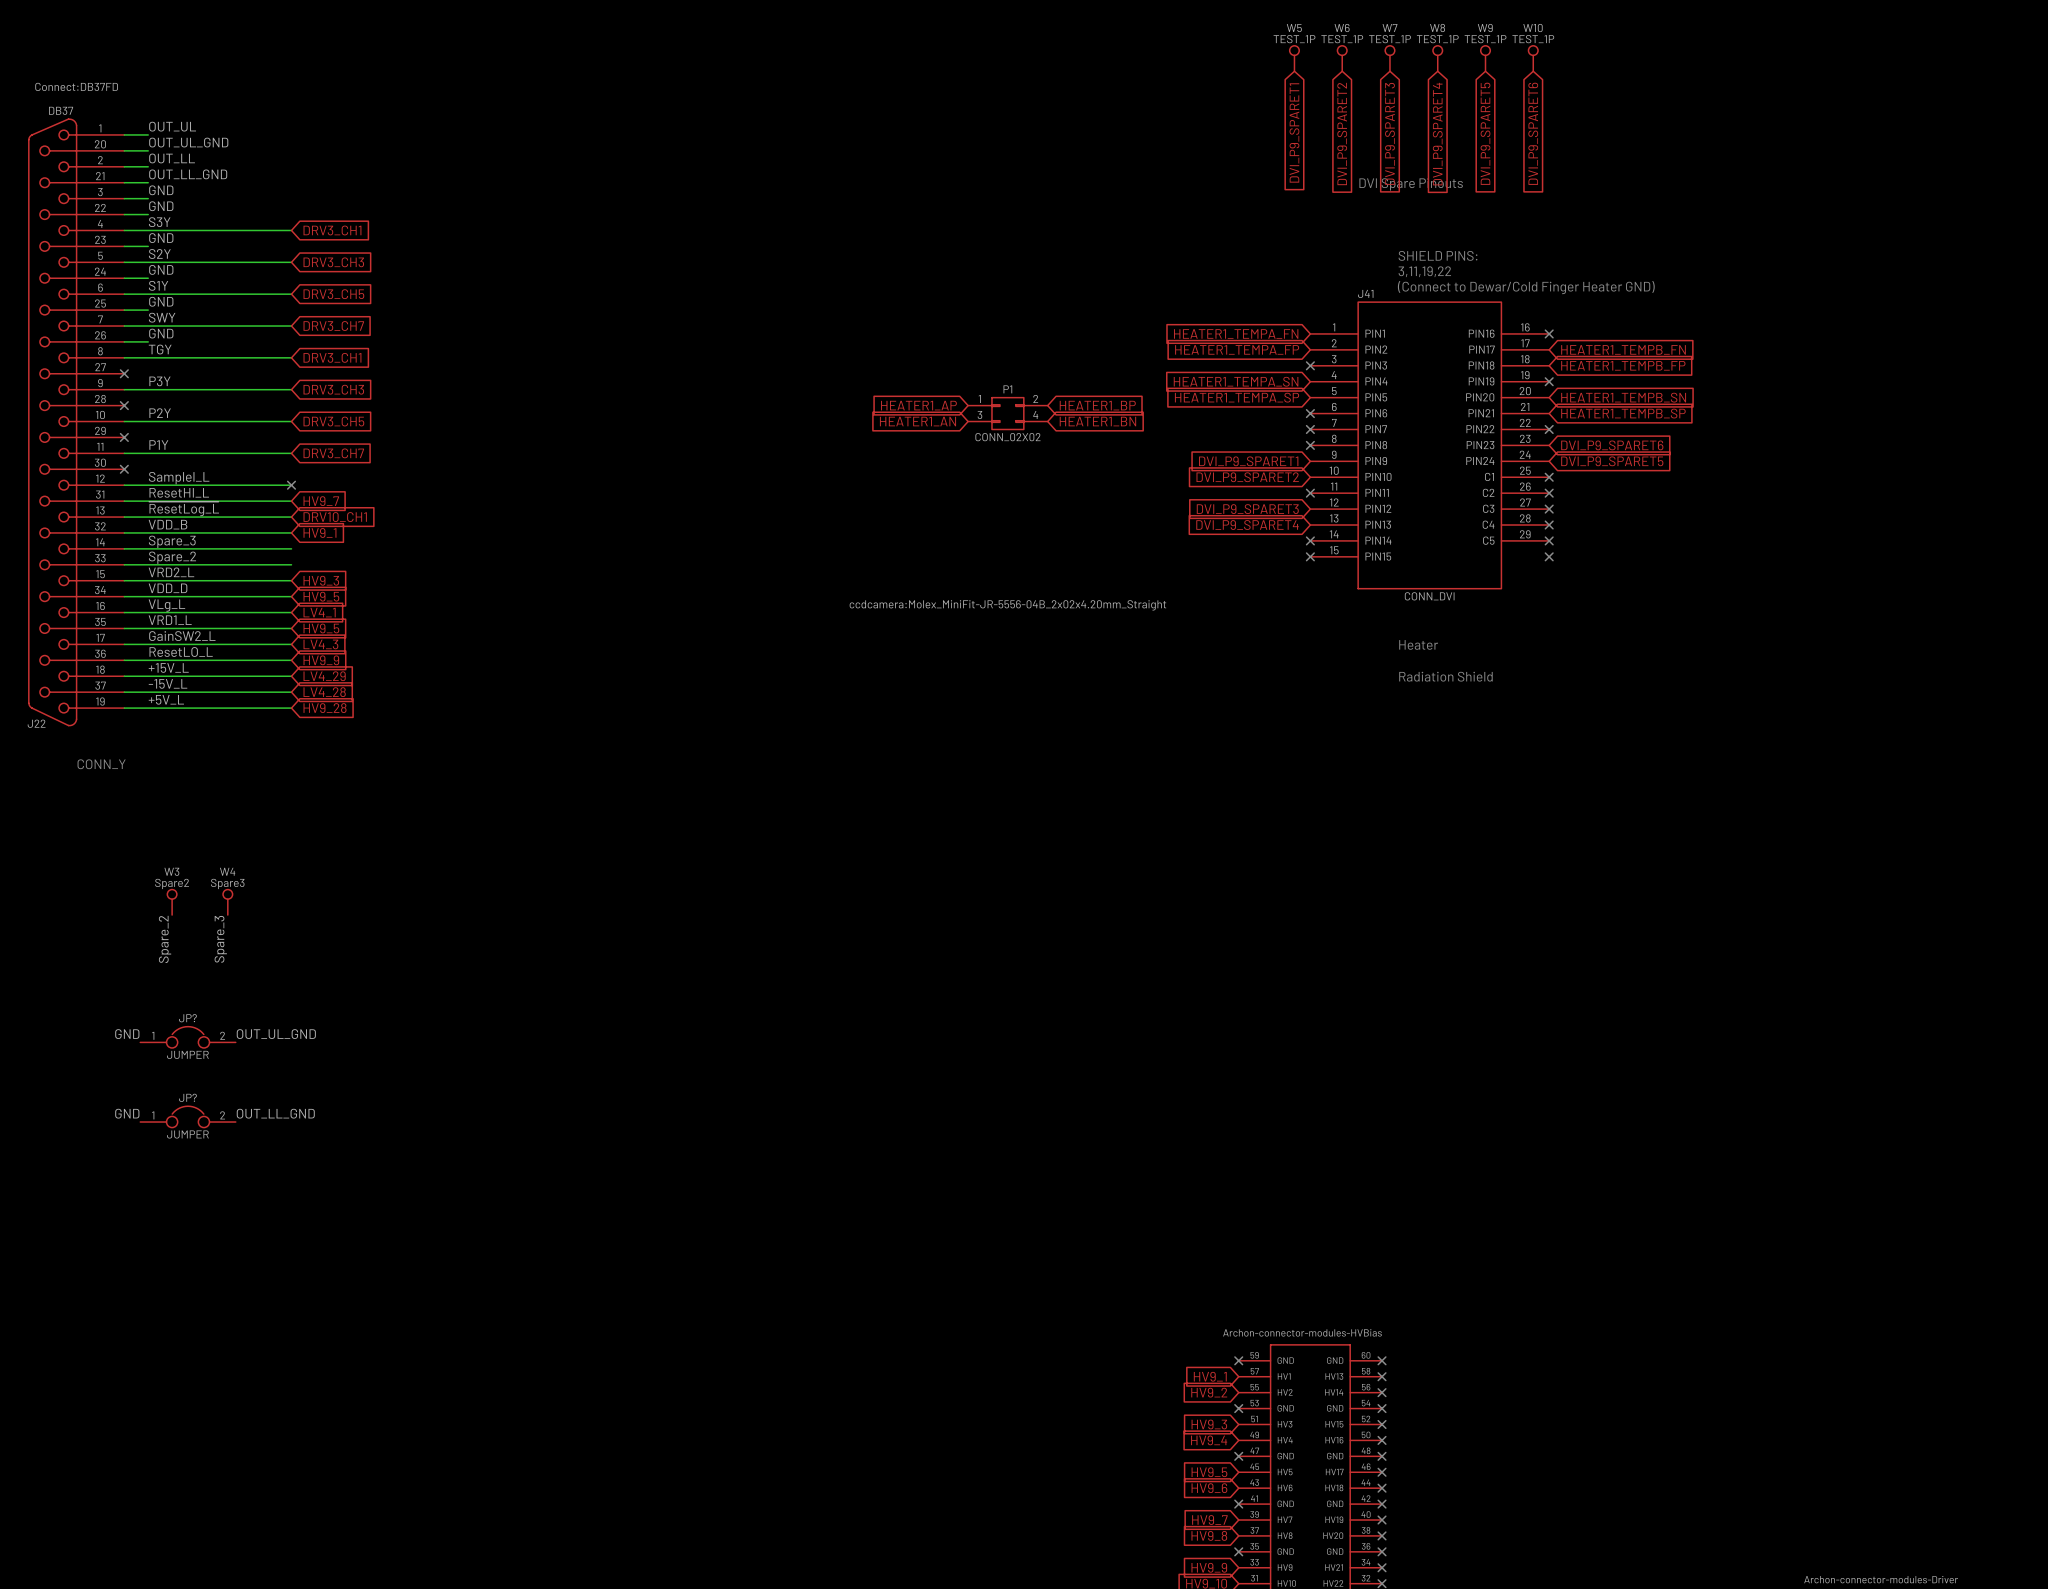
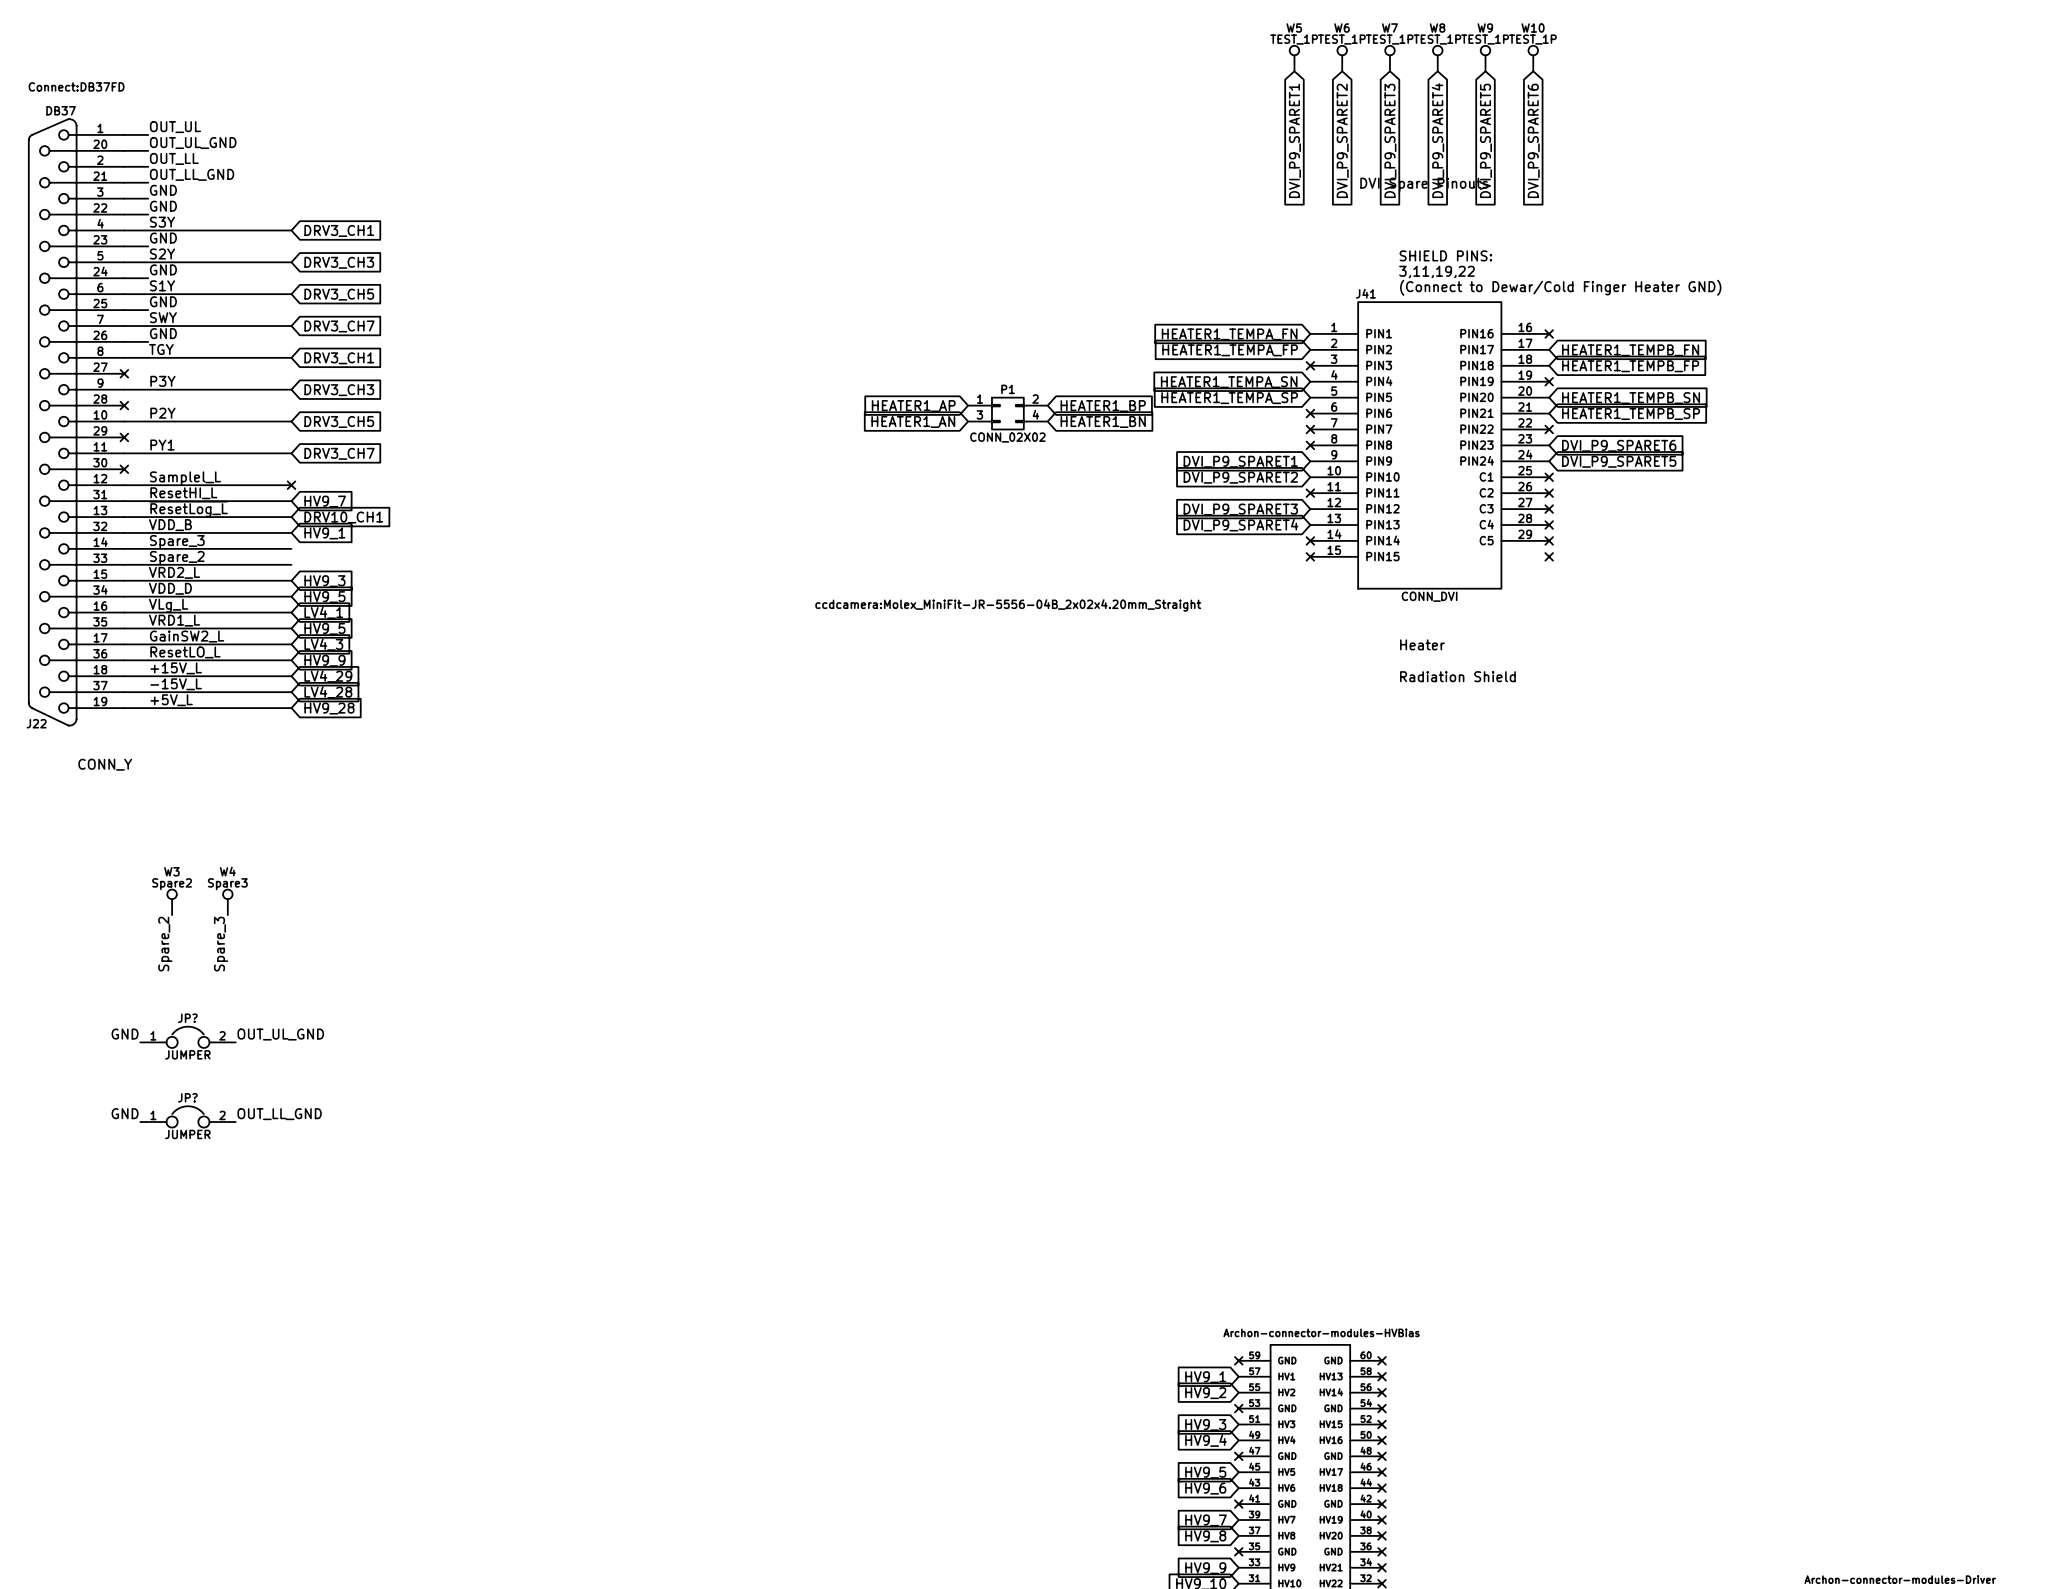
label: P1Y (158, 445) -> PY1 (162, 445)

